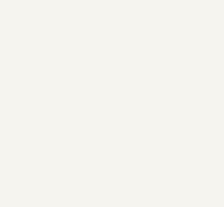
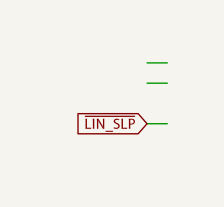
wire: none -> (147, 62) (167, 62)
wire: none -> (147, 83) (167, 83)
wire: none -> (147, 123) (167, 123)
global label: none -> ~{LIN_SLP} (110, 124)

